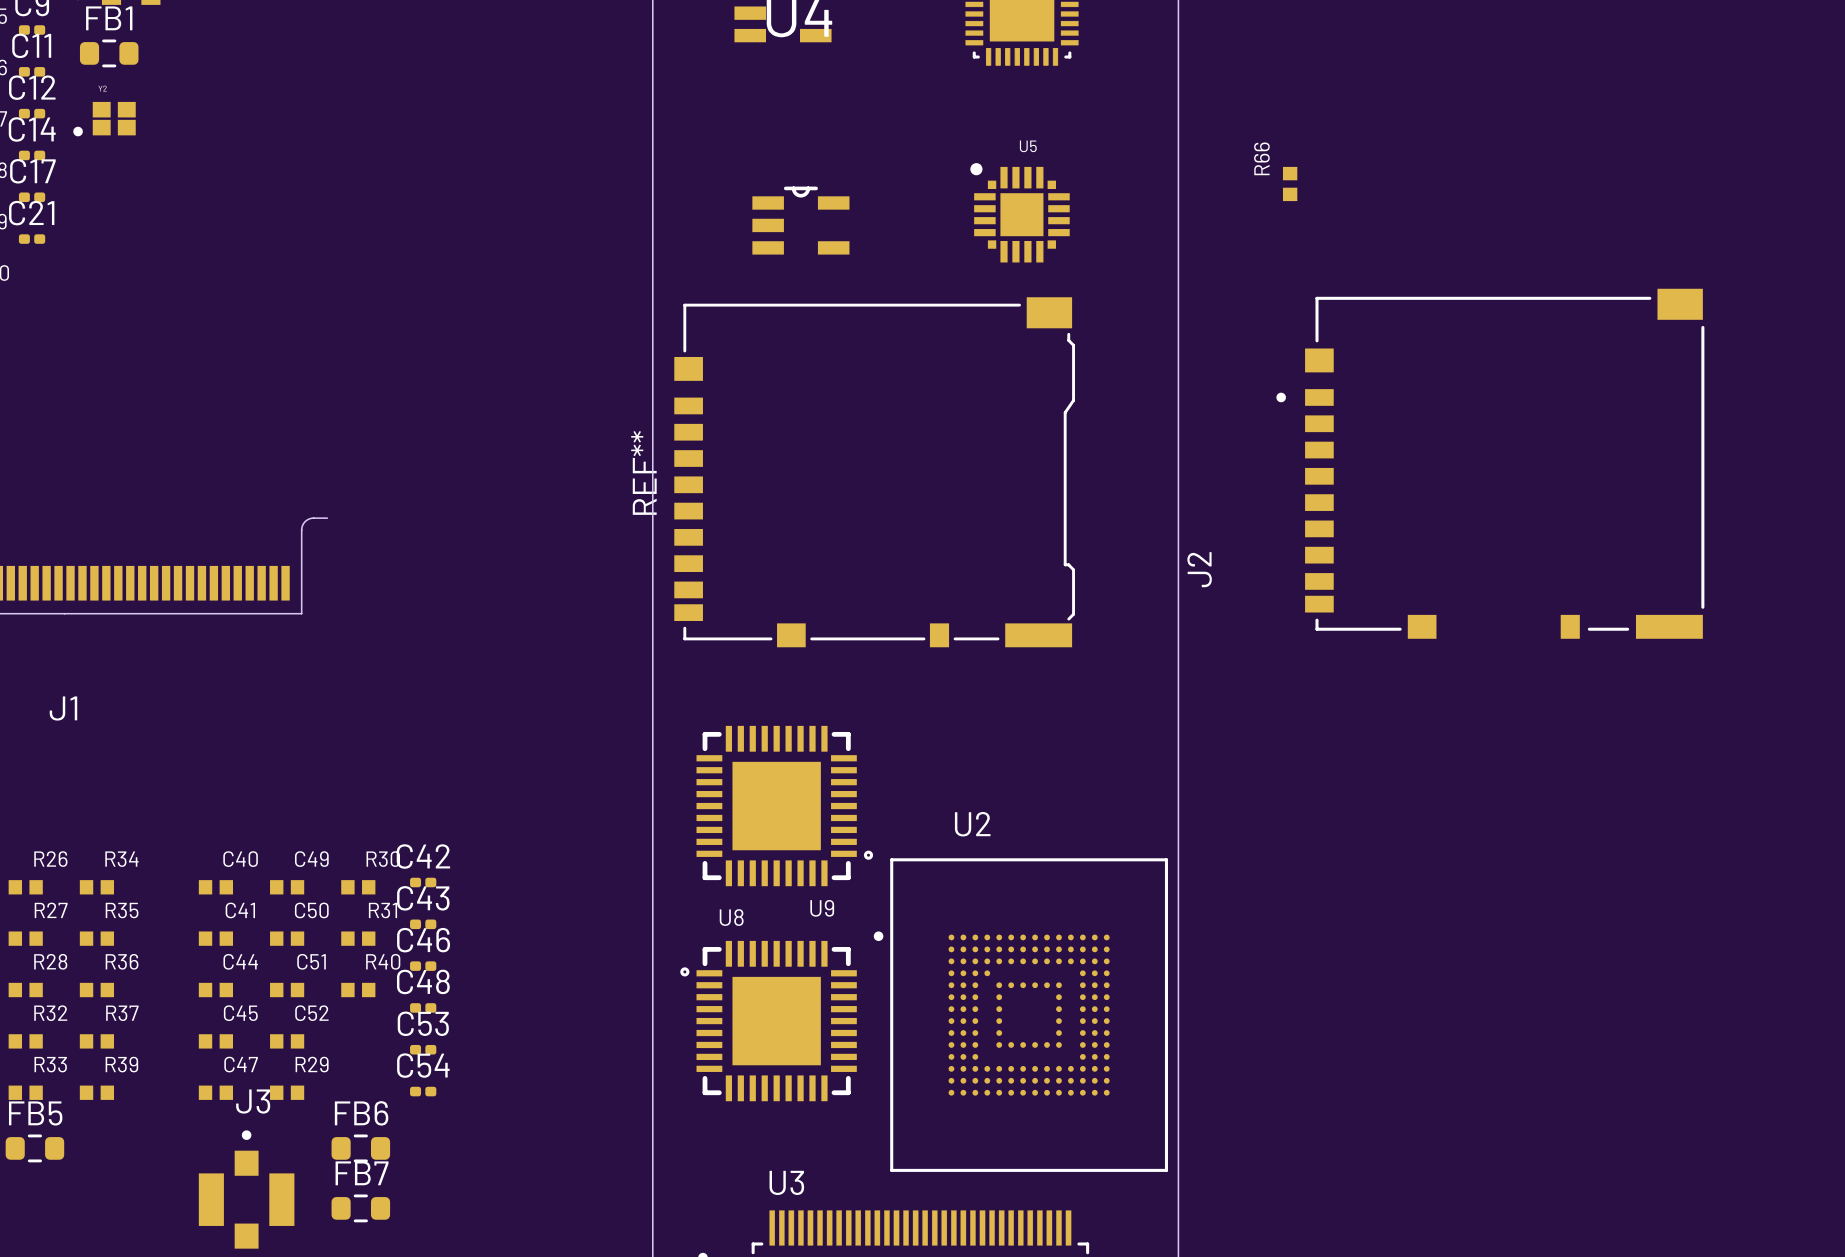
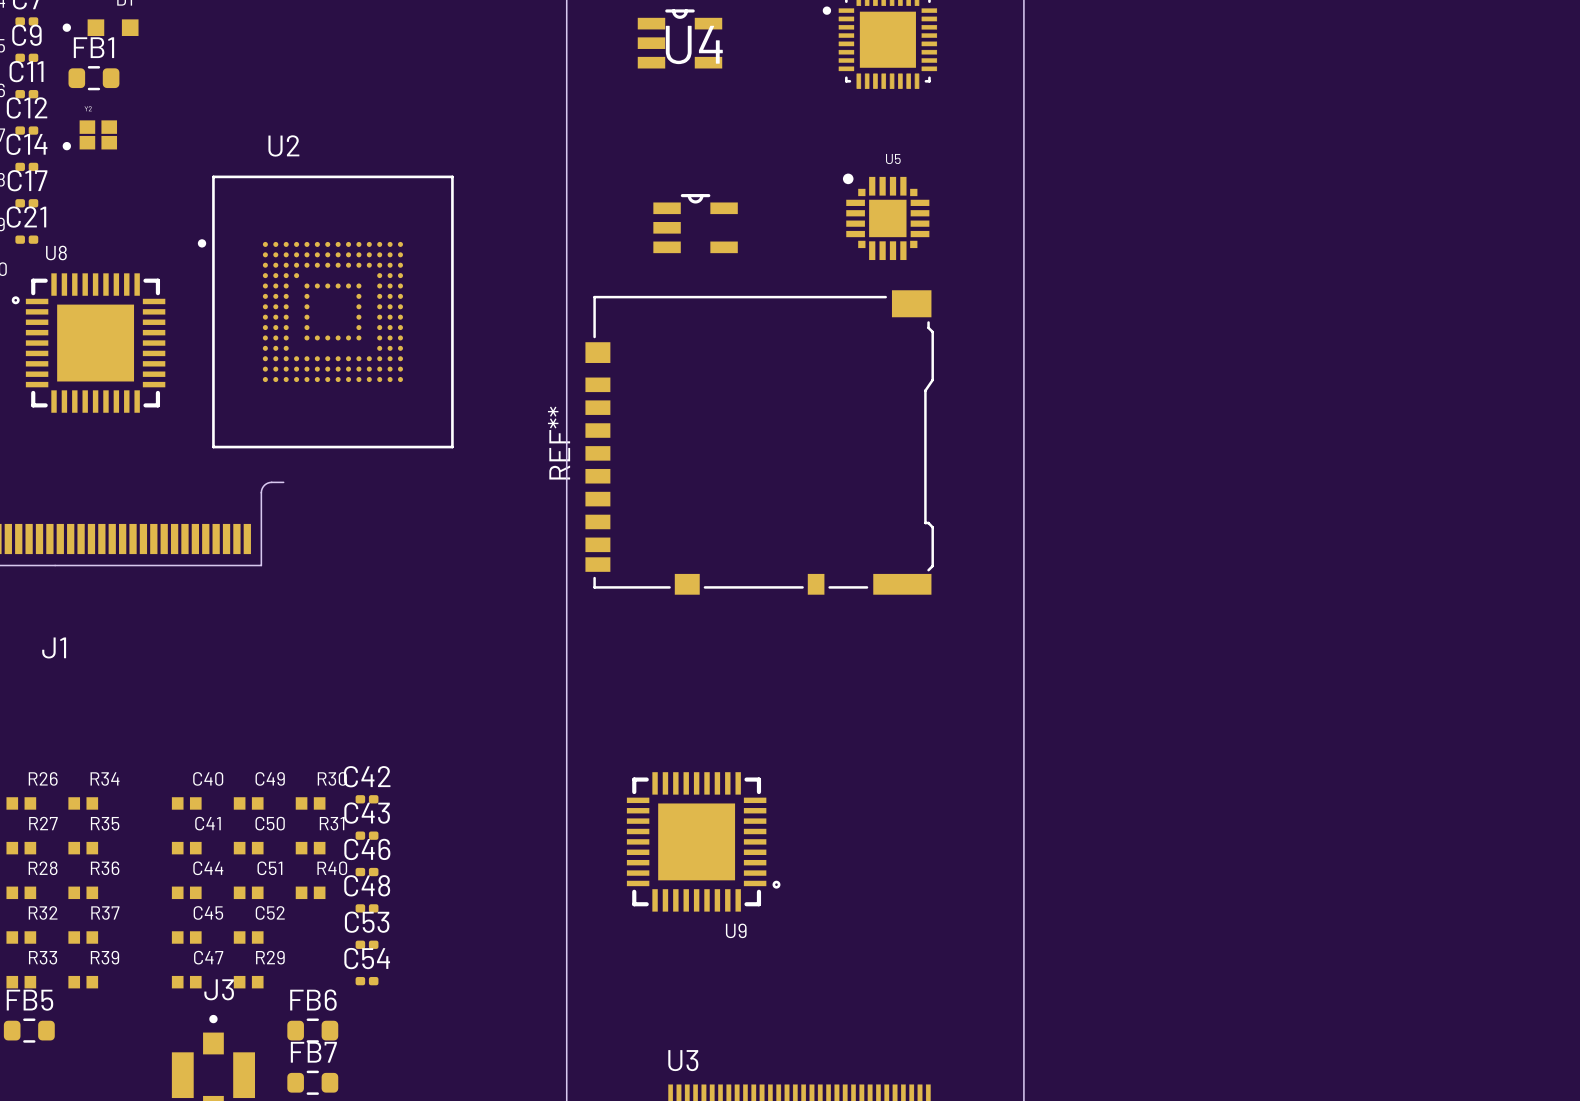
R66: (1290, 183) -> none
J2: (1490, 463) -> none
U9 position: (784, 806) -> (703, 841)
U2 position: (1020, 1015) -> (325, 311)
U8 position: (768, 1021) -> (88, 343)

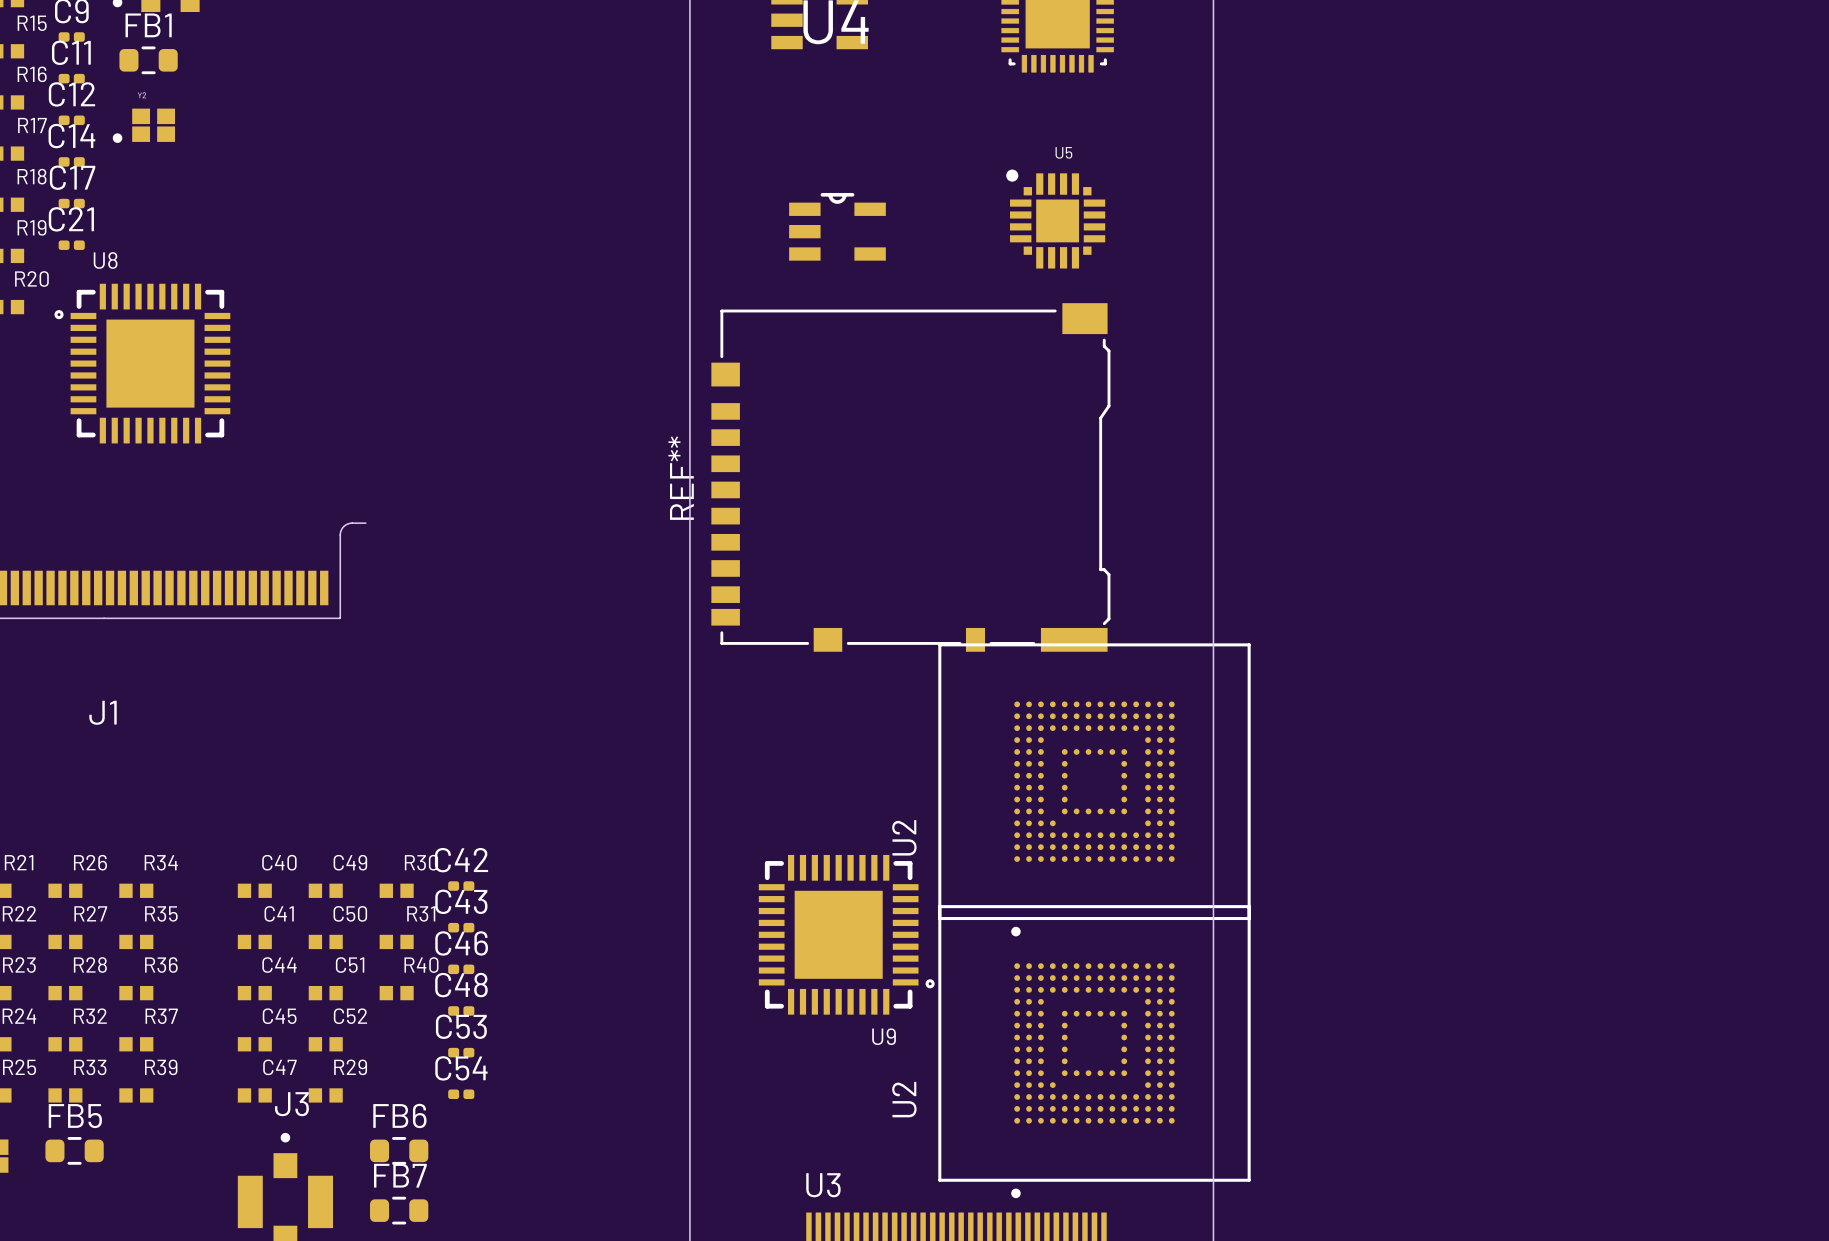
U2: (325, 311) -> none
U2: none -> (1094, 789)
U2: none -> (1094, 1051)

